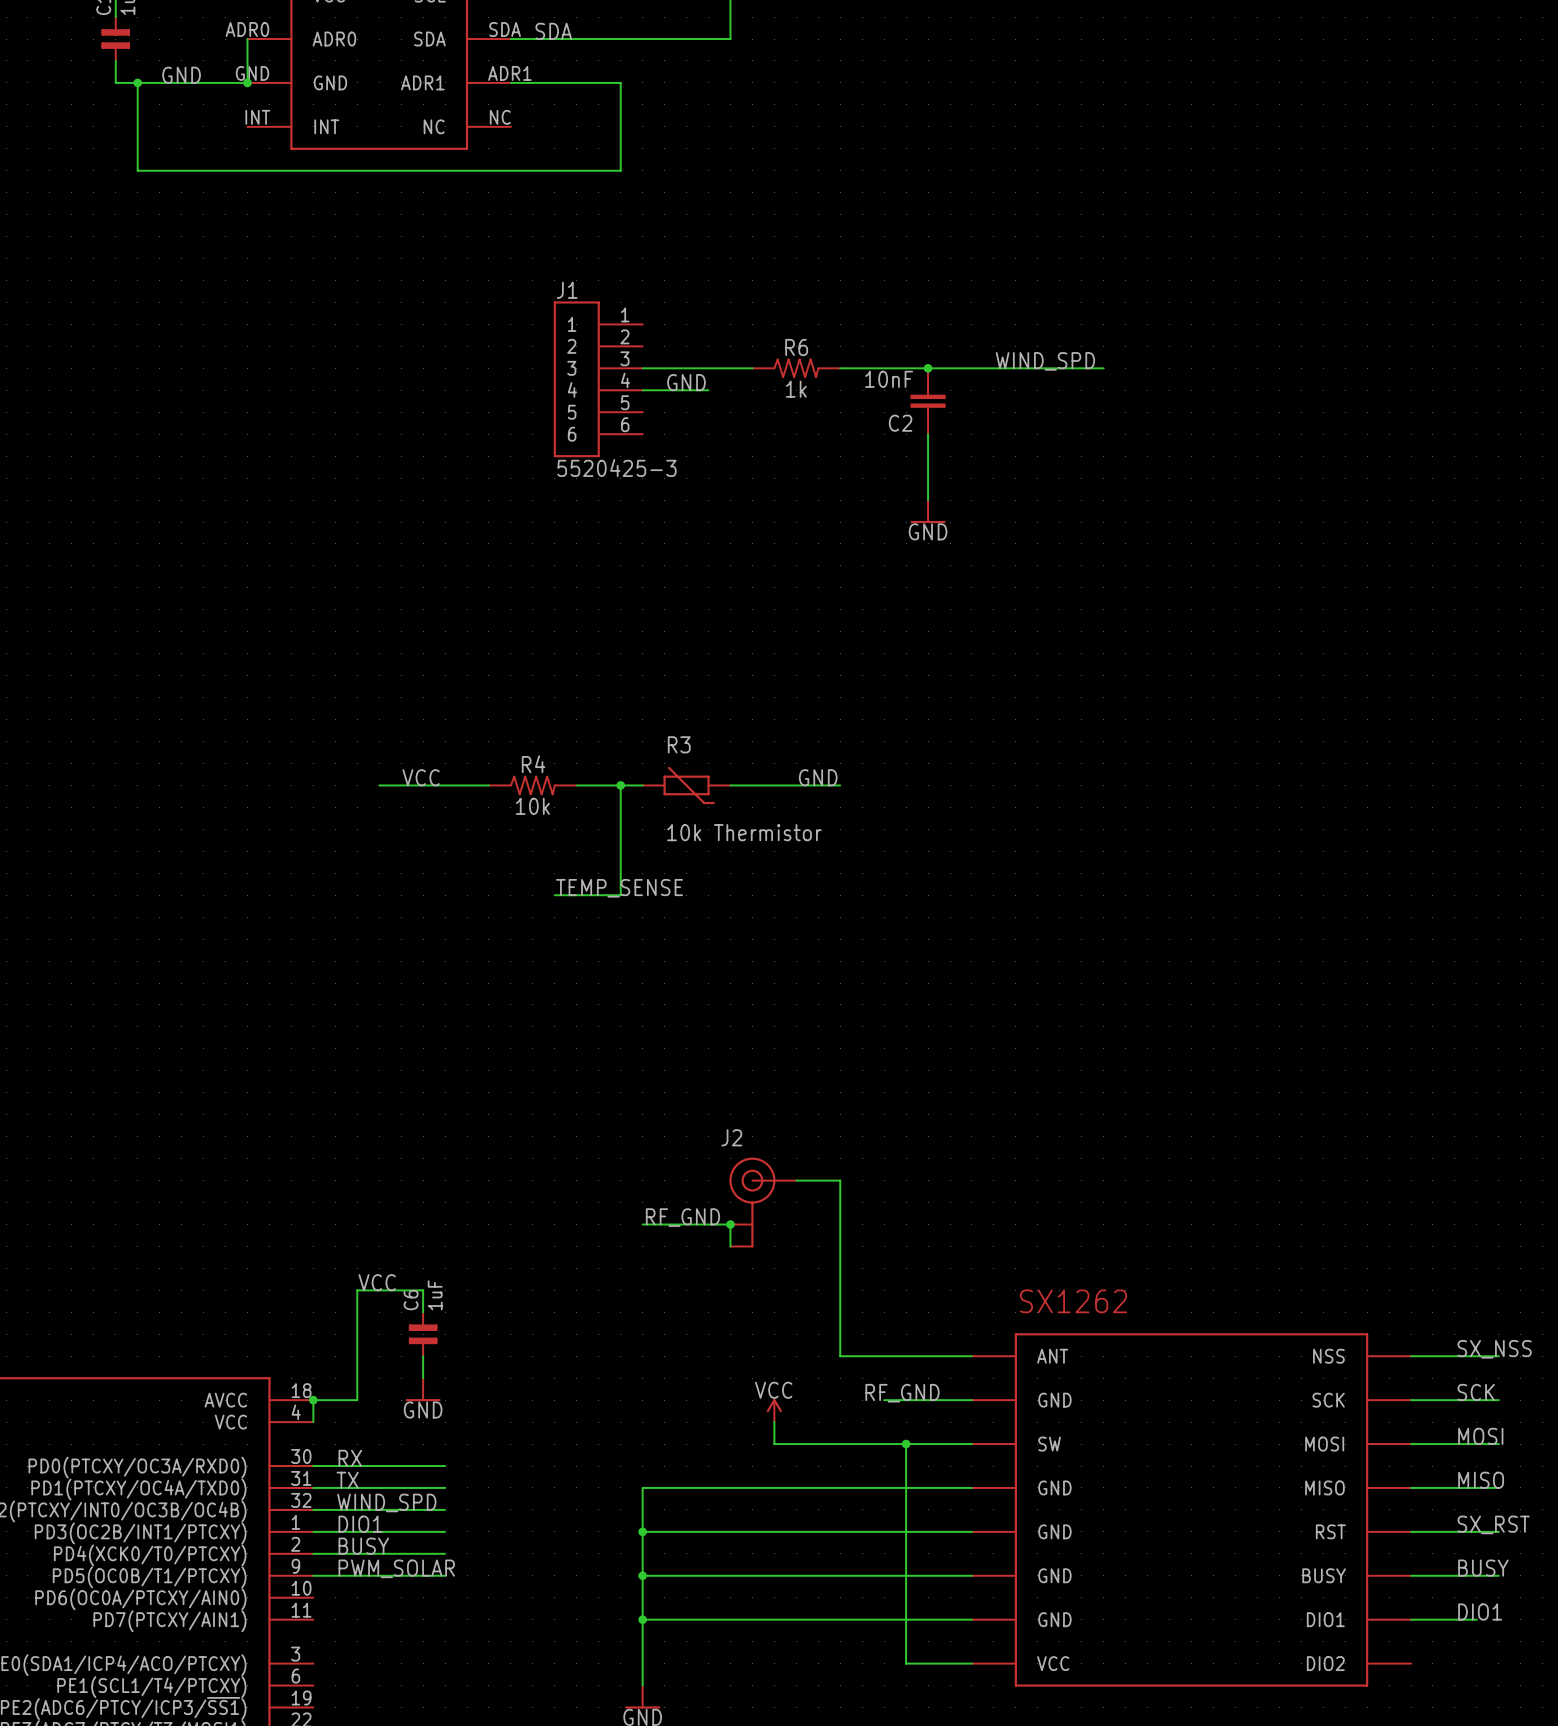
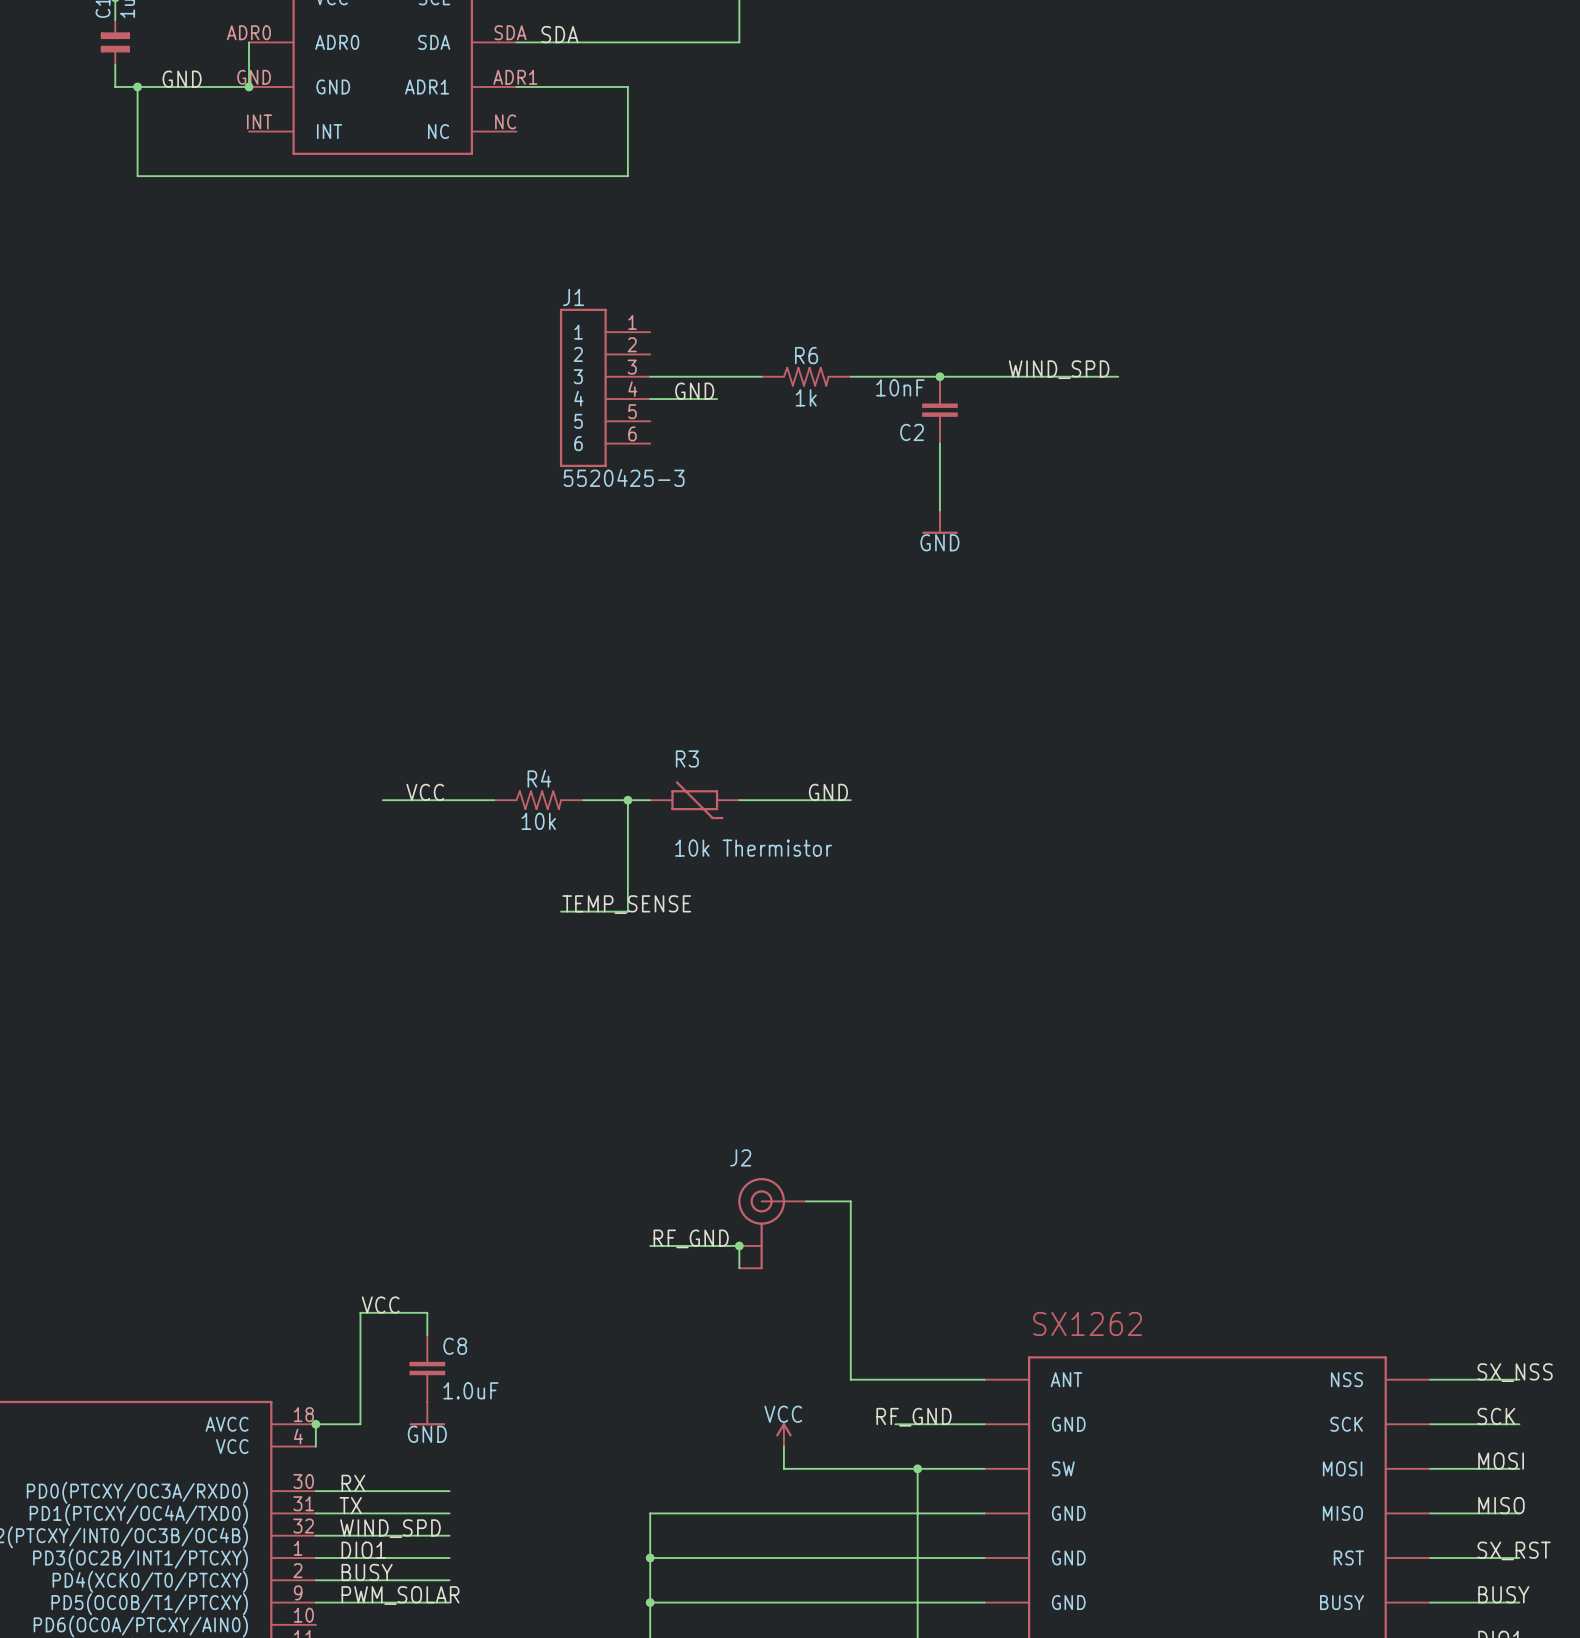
C6: 1uF (423, 1334) -> none
C8: none -> 1.0uF (427, 1368)

